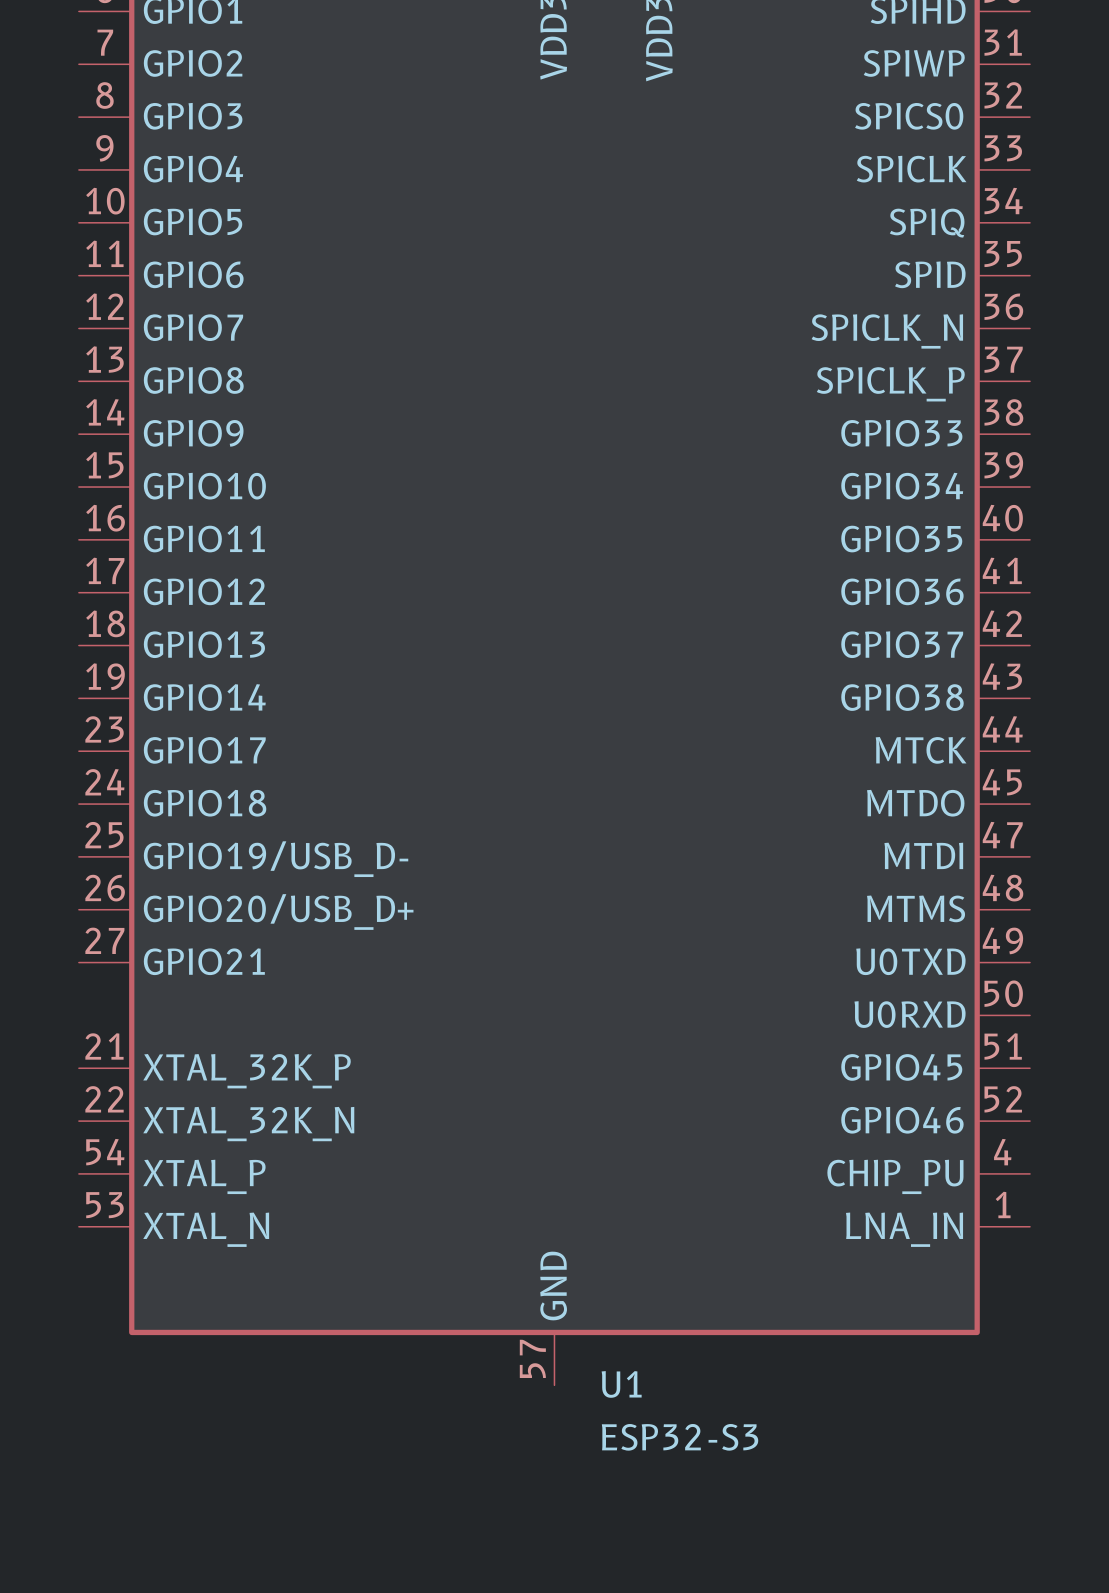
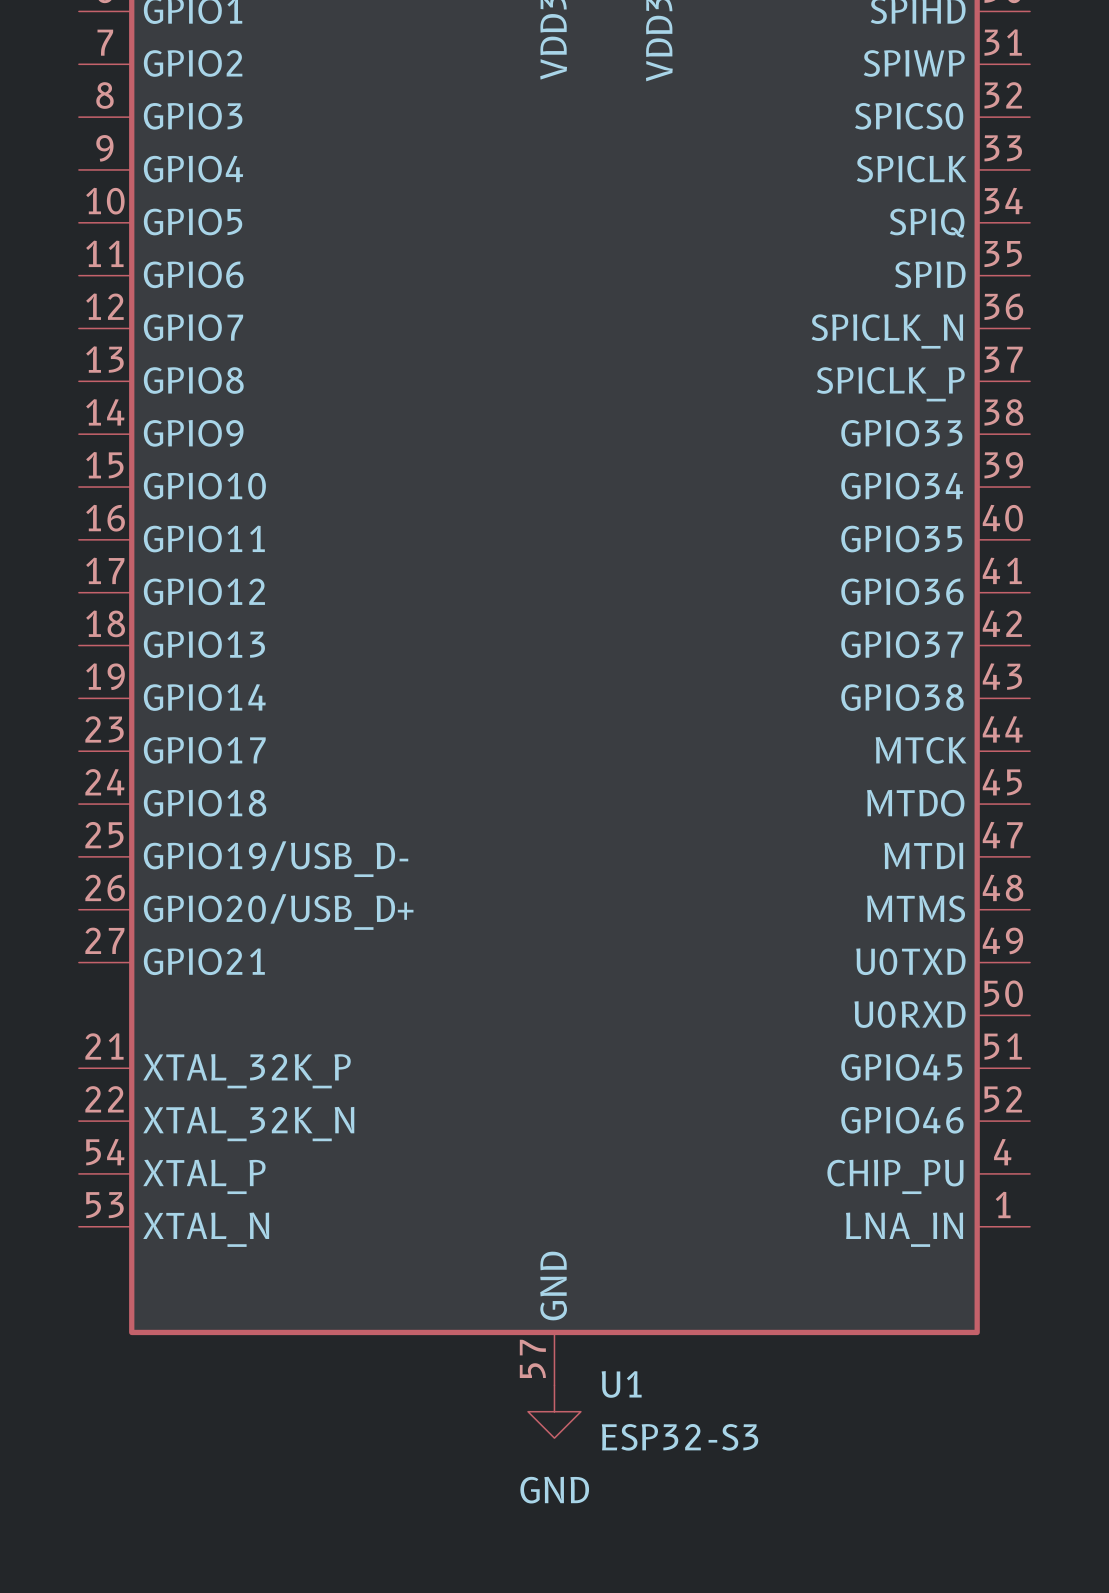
power symbol: none -> GND (554, 1411)

